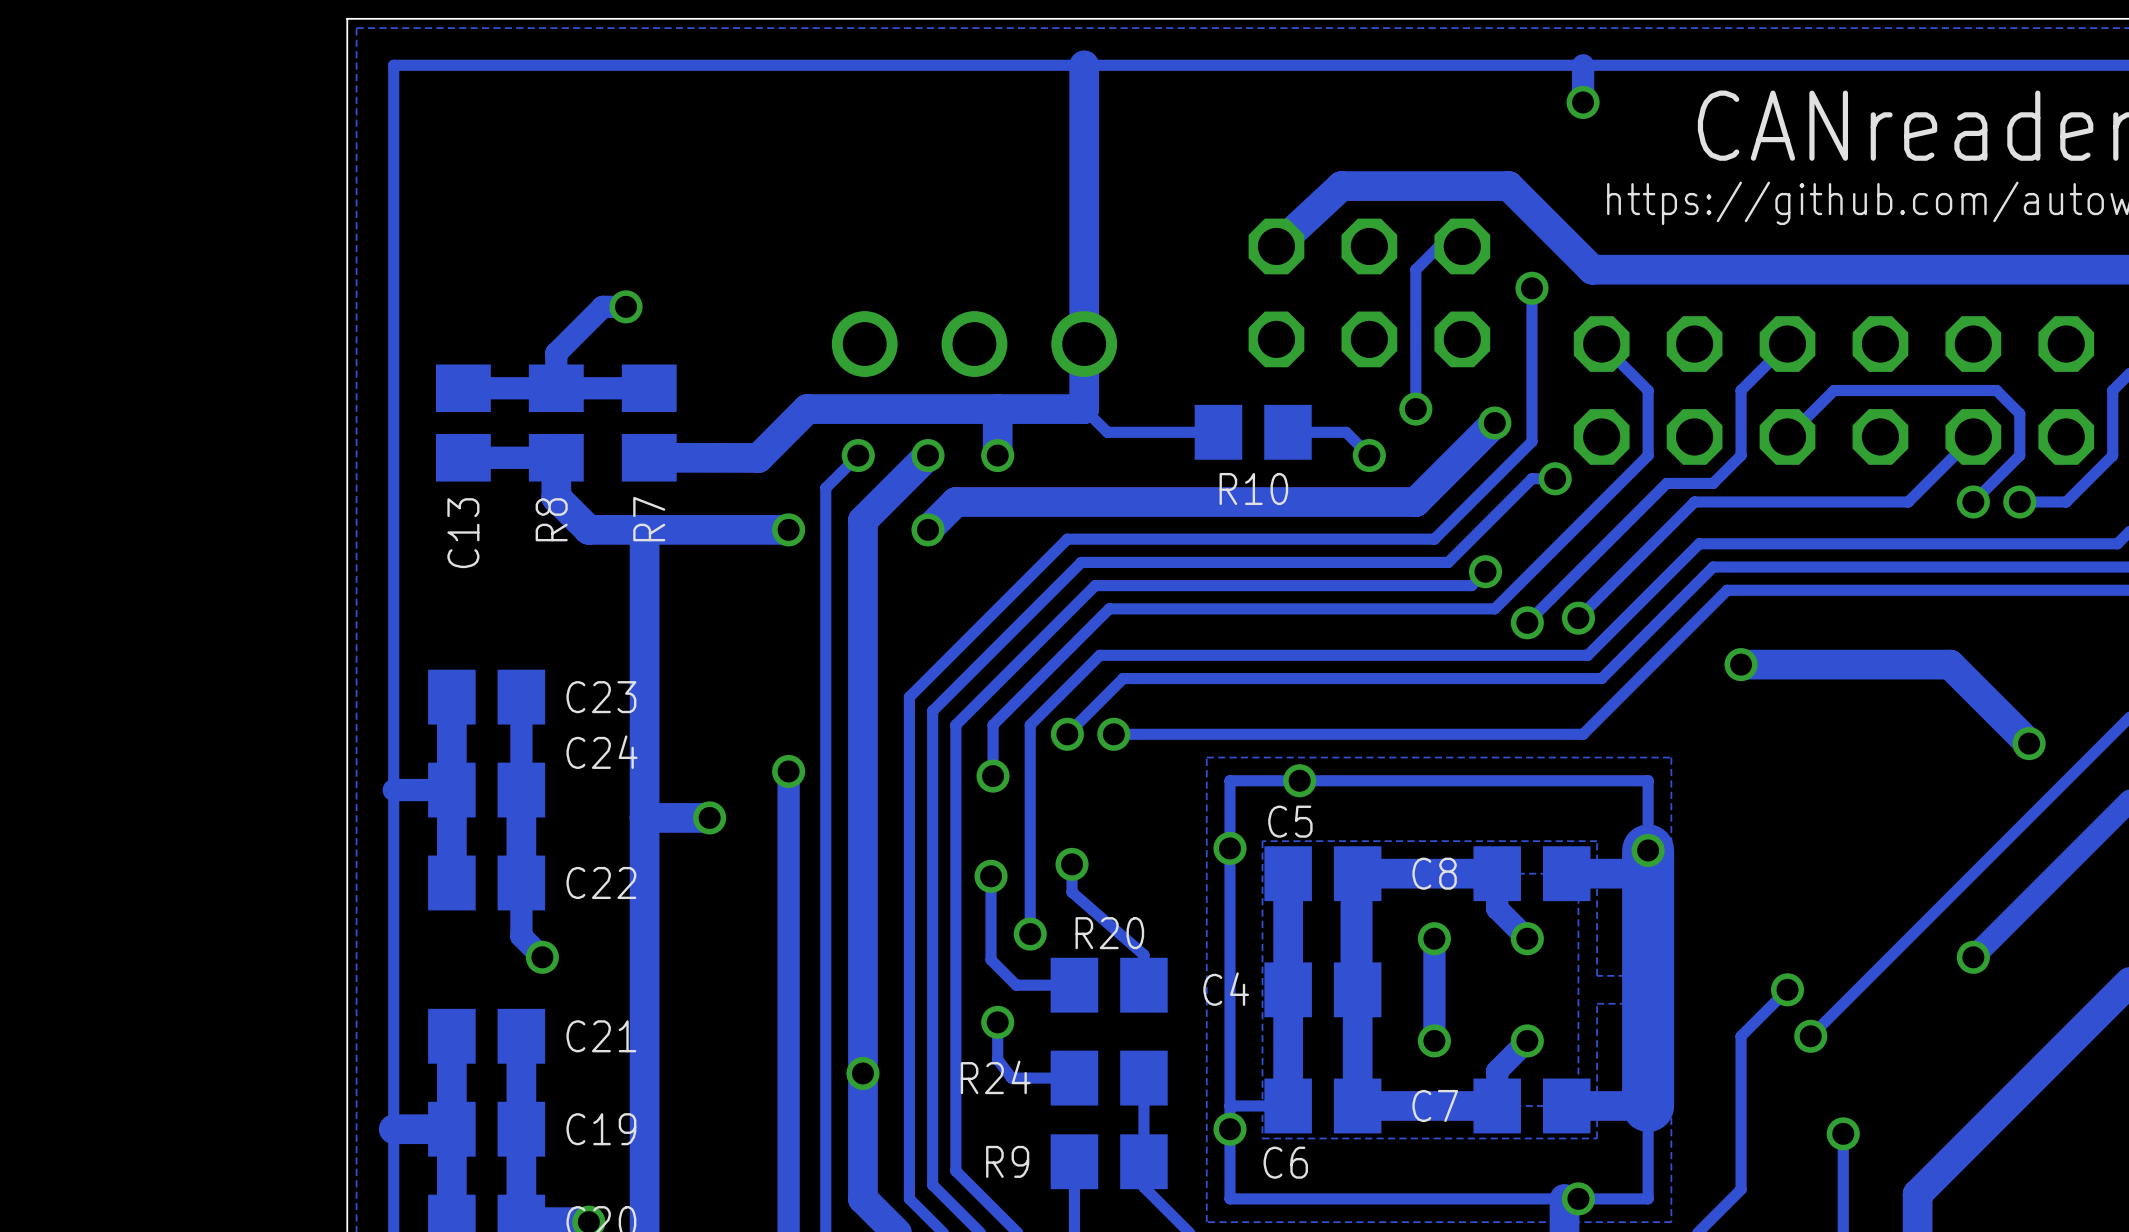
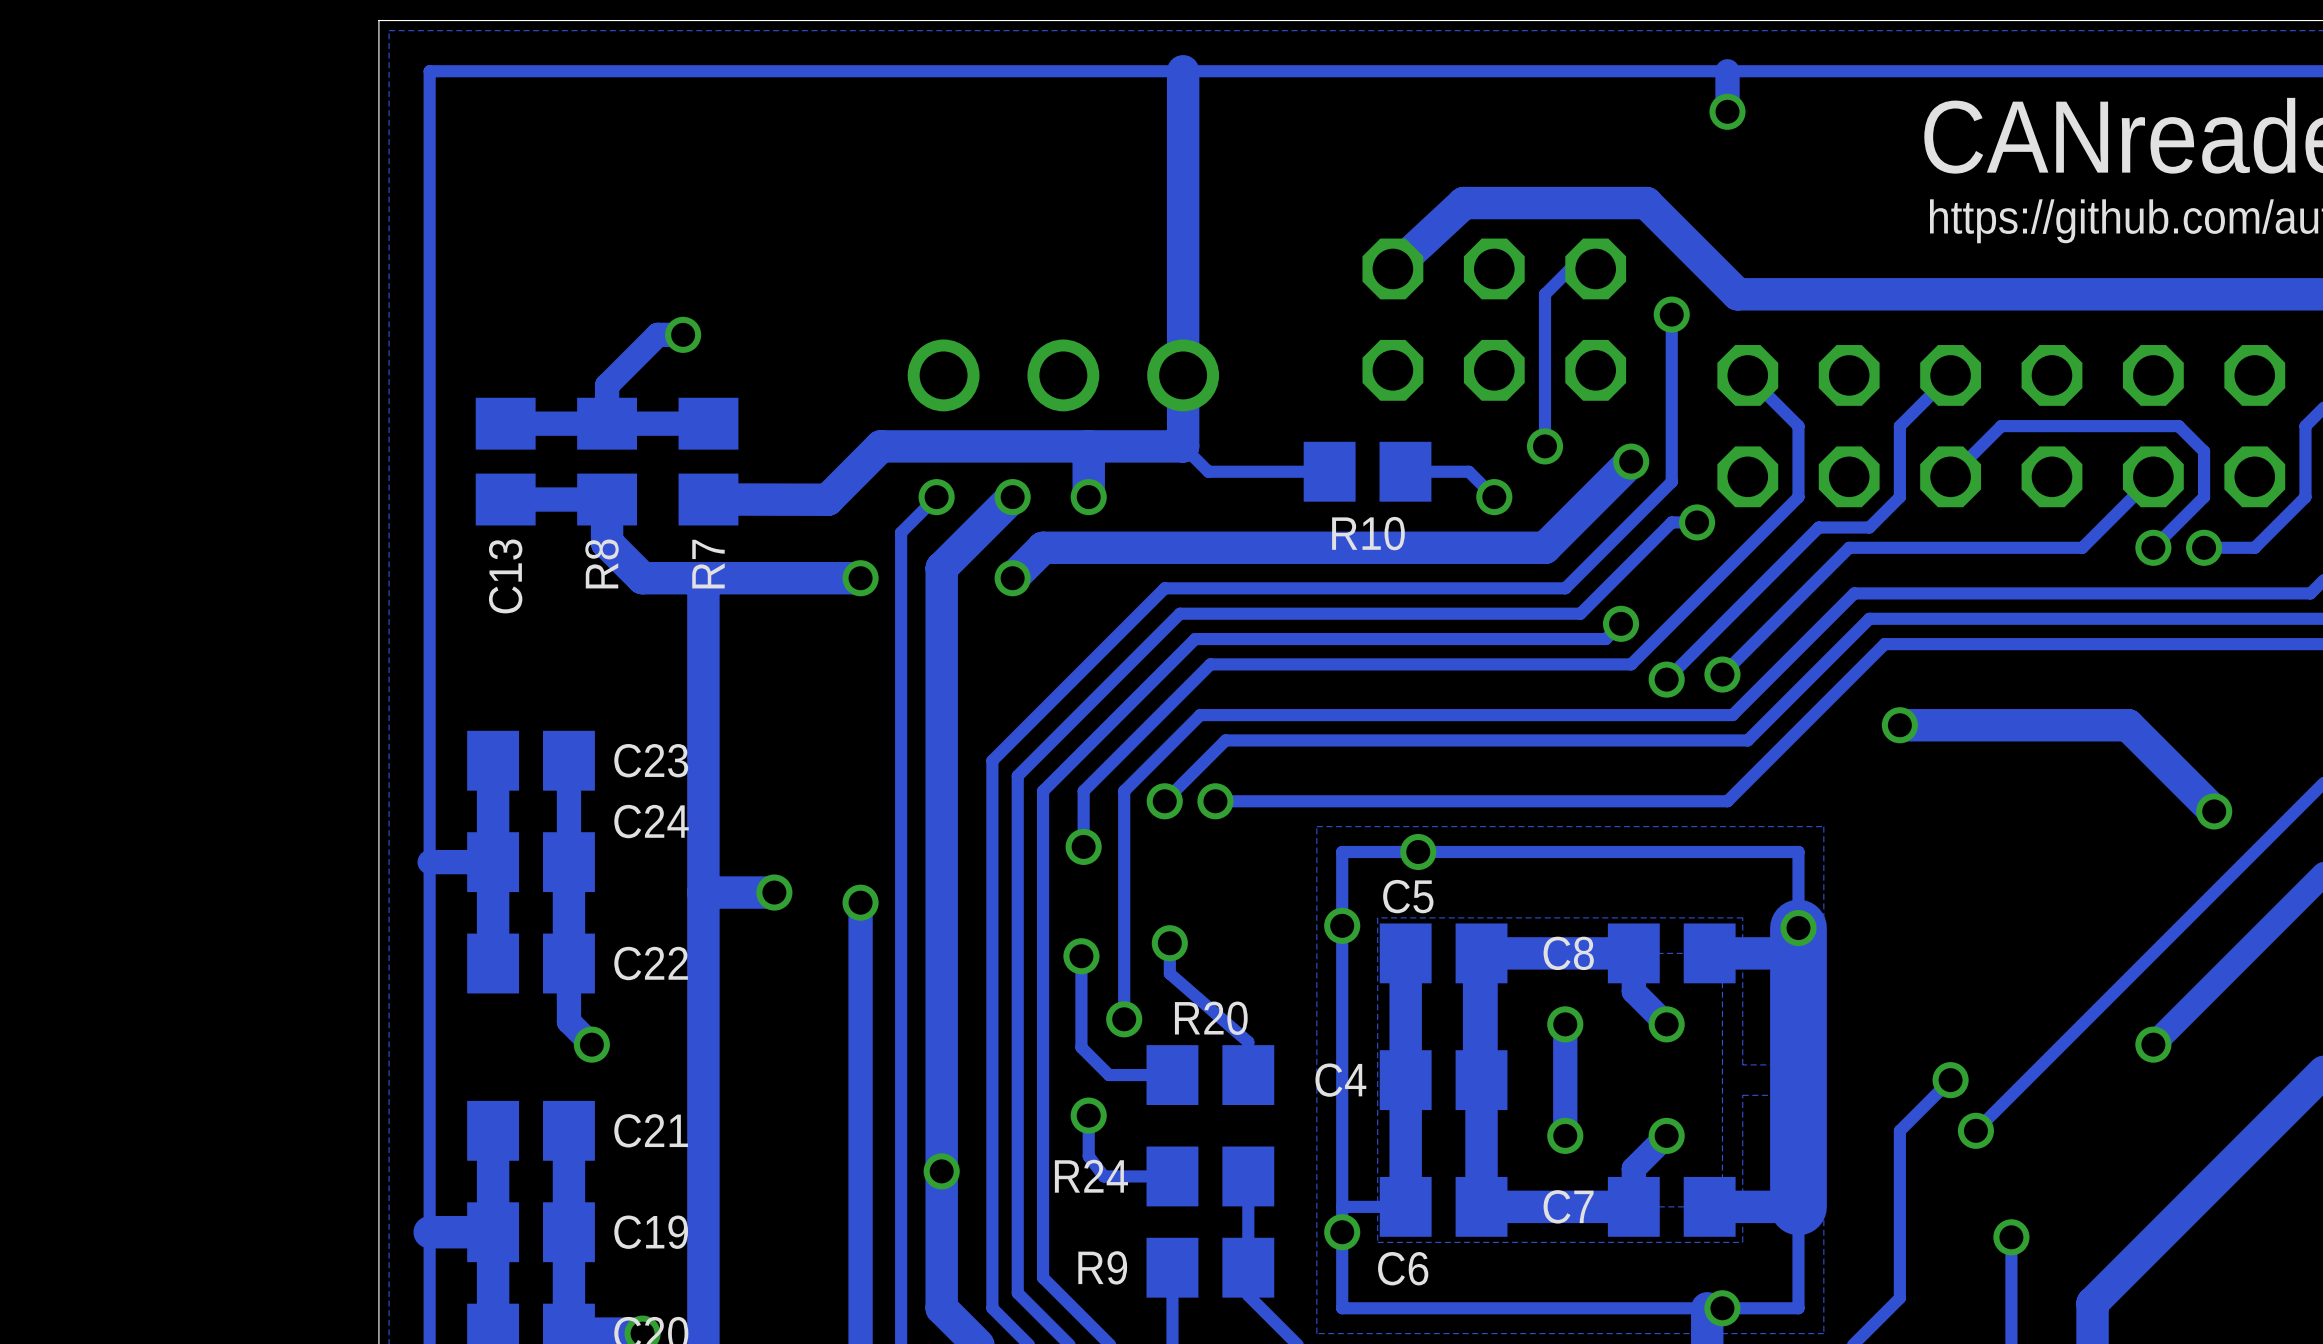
track: (788, 771) (788, 827) -> none
via position: (788, 771) -> (860, 902)

